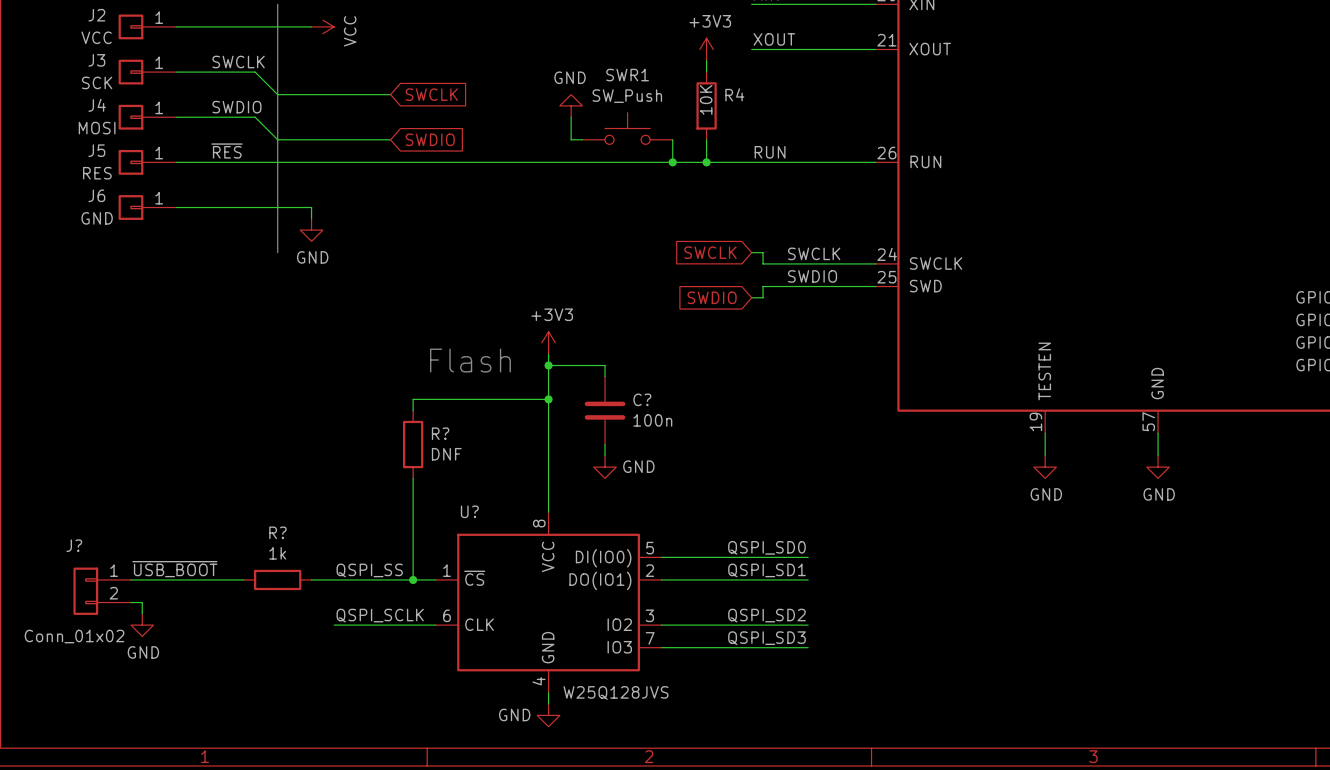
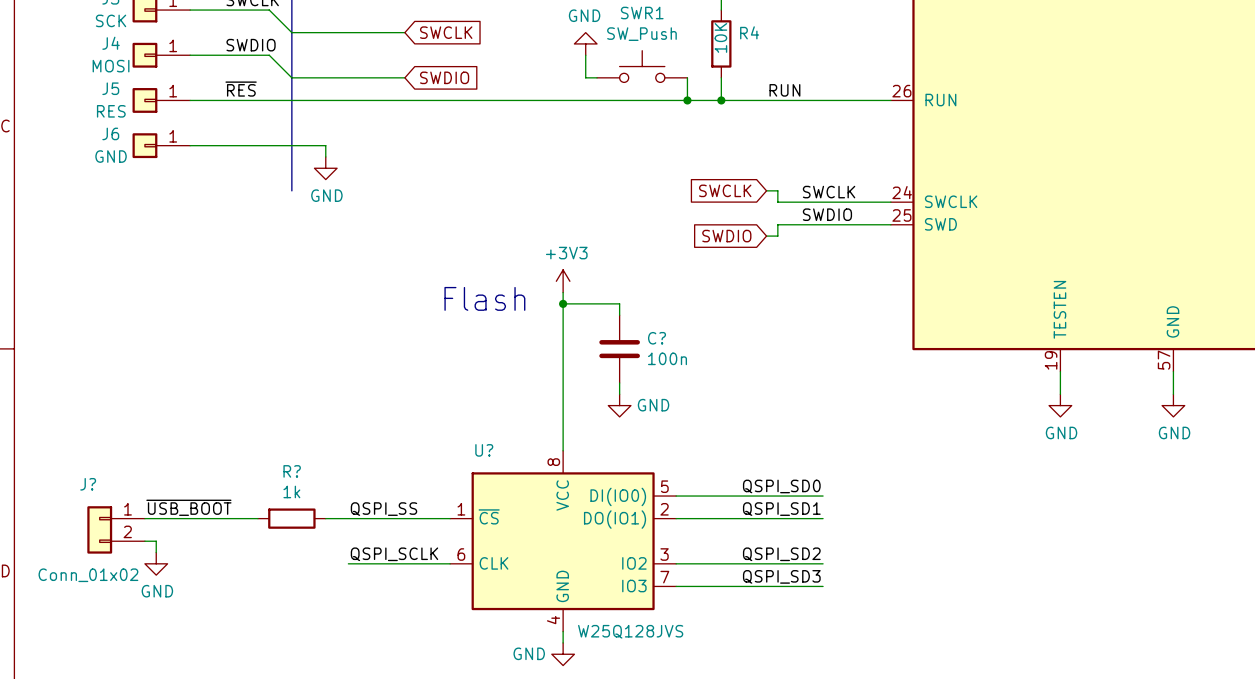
wire: (548, 399) (413, 399) (413, 410) -> none
junction: (548, 399) -> none
R?: DNF (413, 444) -> none
wire: (413, 478) (413, 579) -> none
junction: (413, 579) -> none

